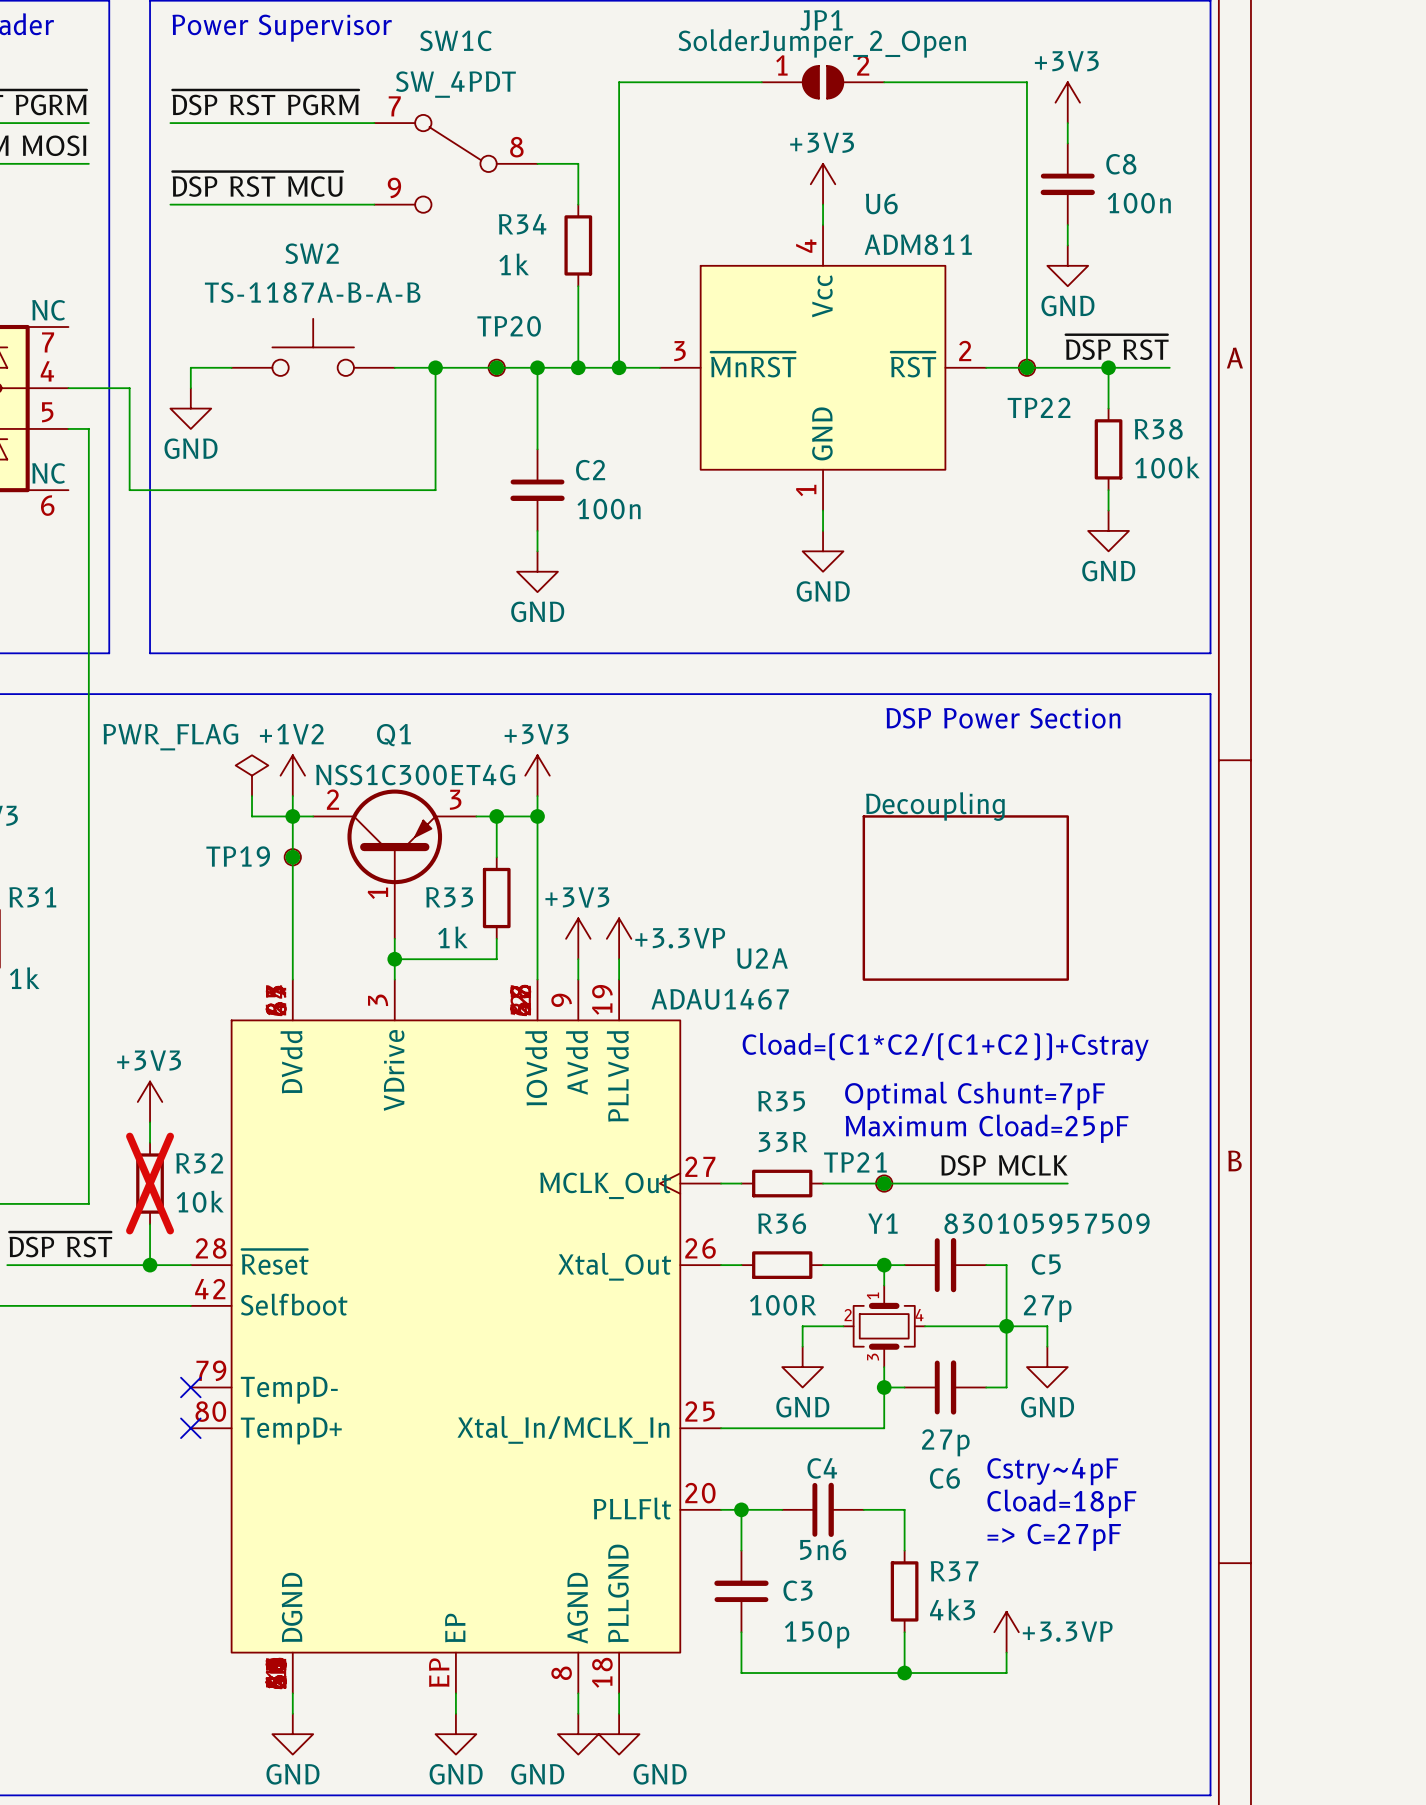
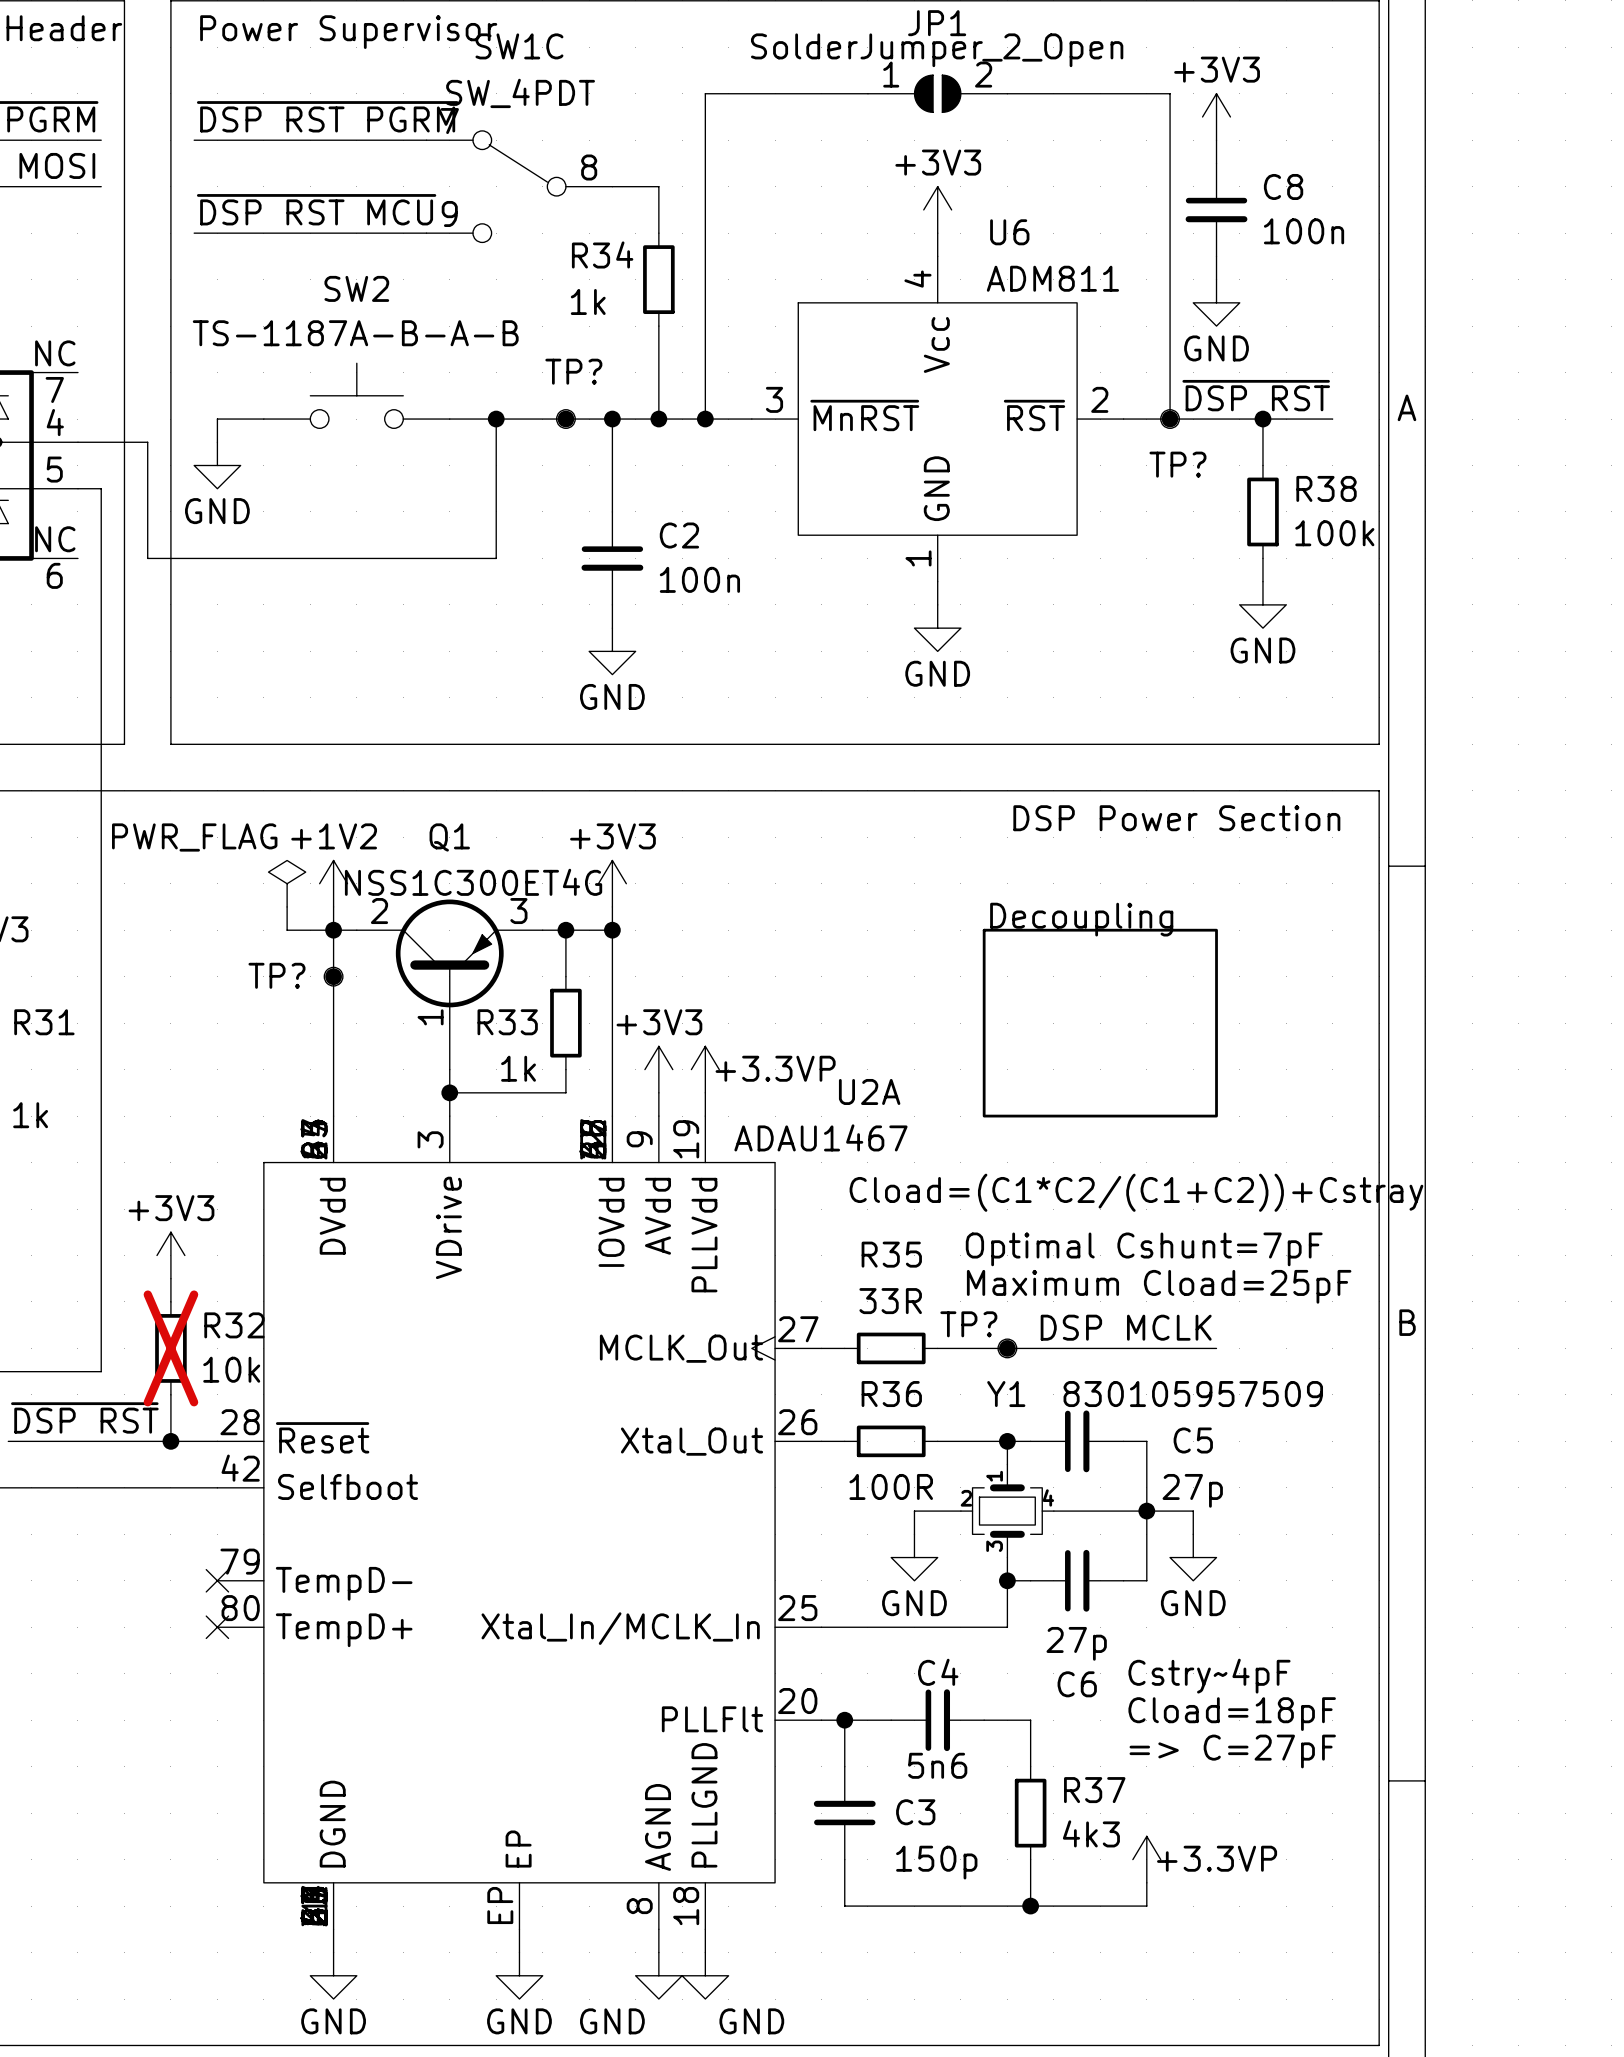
TP20 name: TP20 (509, 326) -> TP? (573, 371)
TP22 name: TP22 (1039, 407) -> TP? (1177, 464)
TP19 name: TP19 (238, 856) -> TP? (276, 975)
TP21 name: TP21 (855, 1162) -> TP? (968, 1324)

